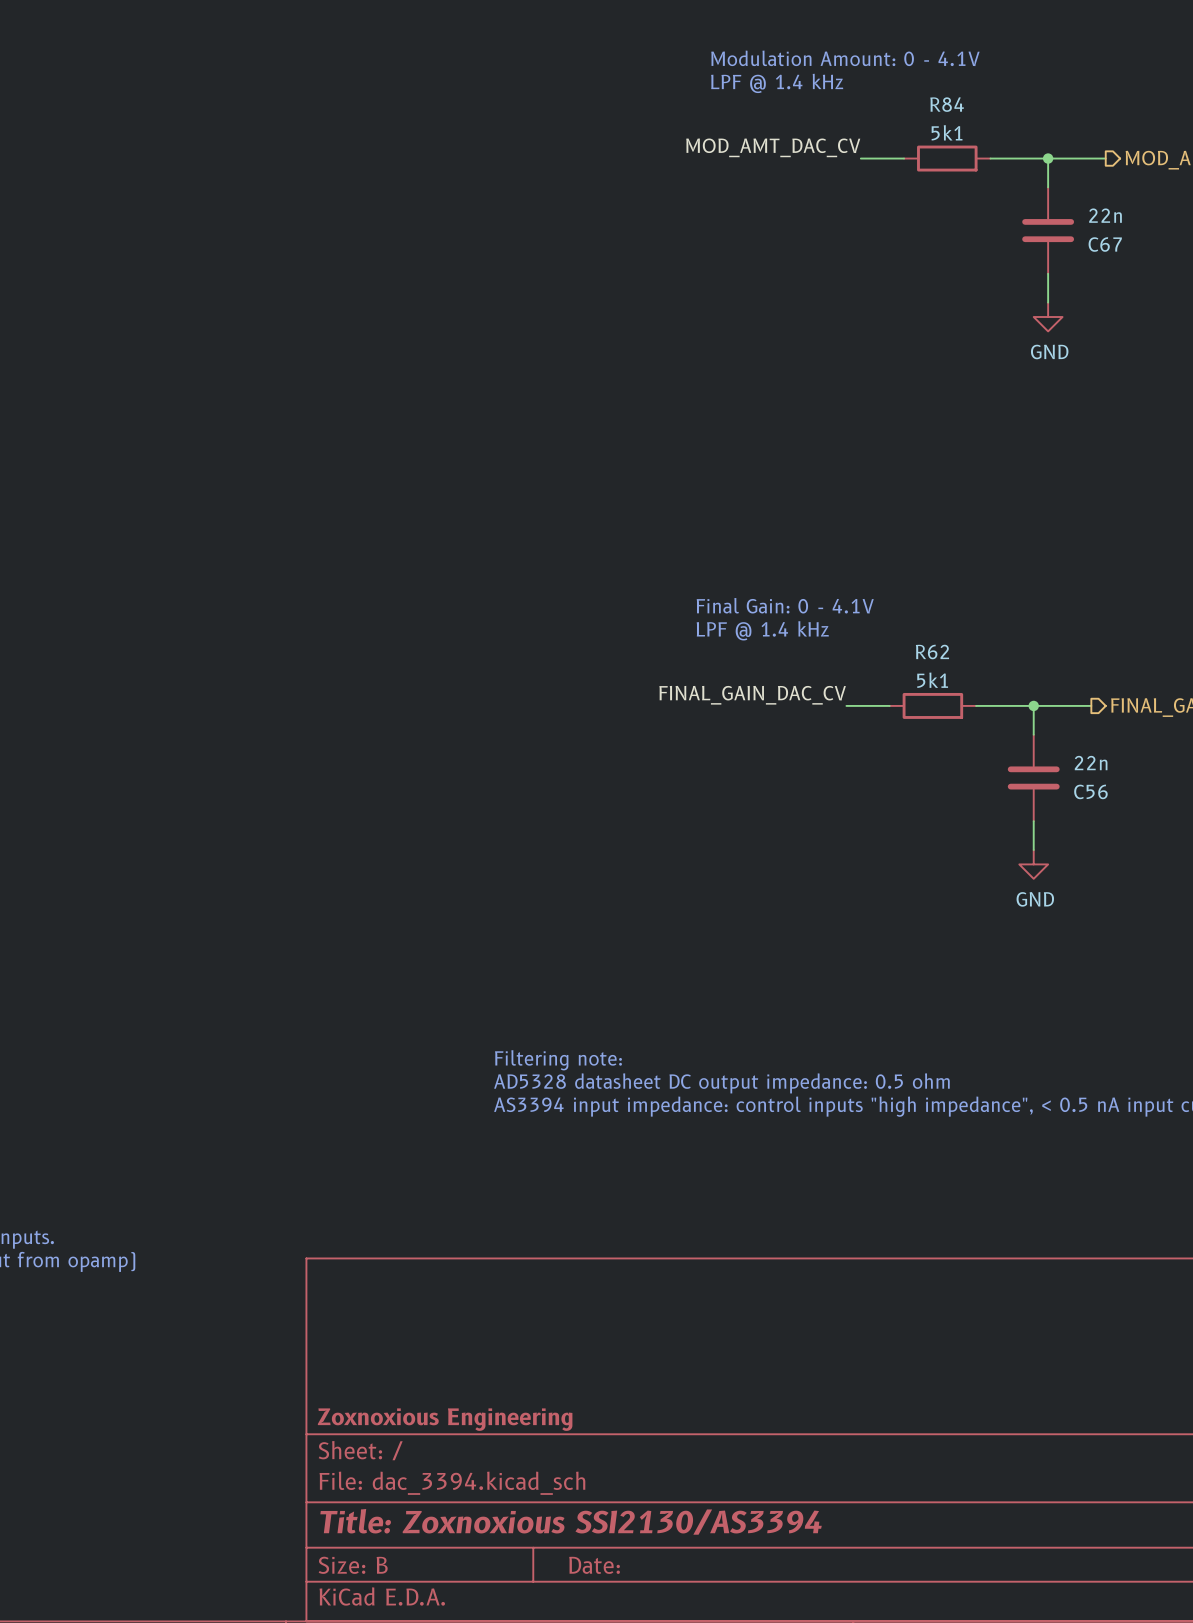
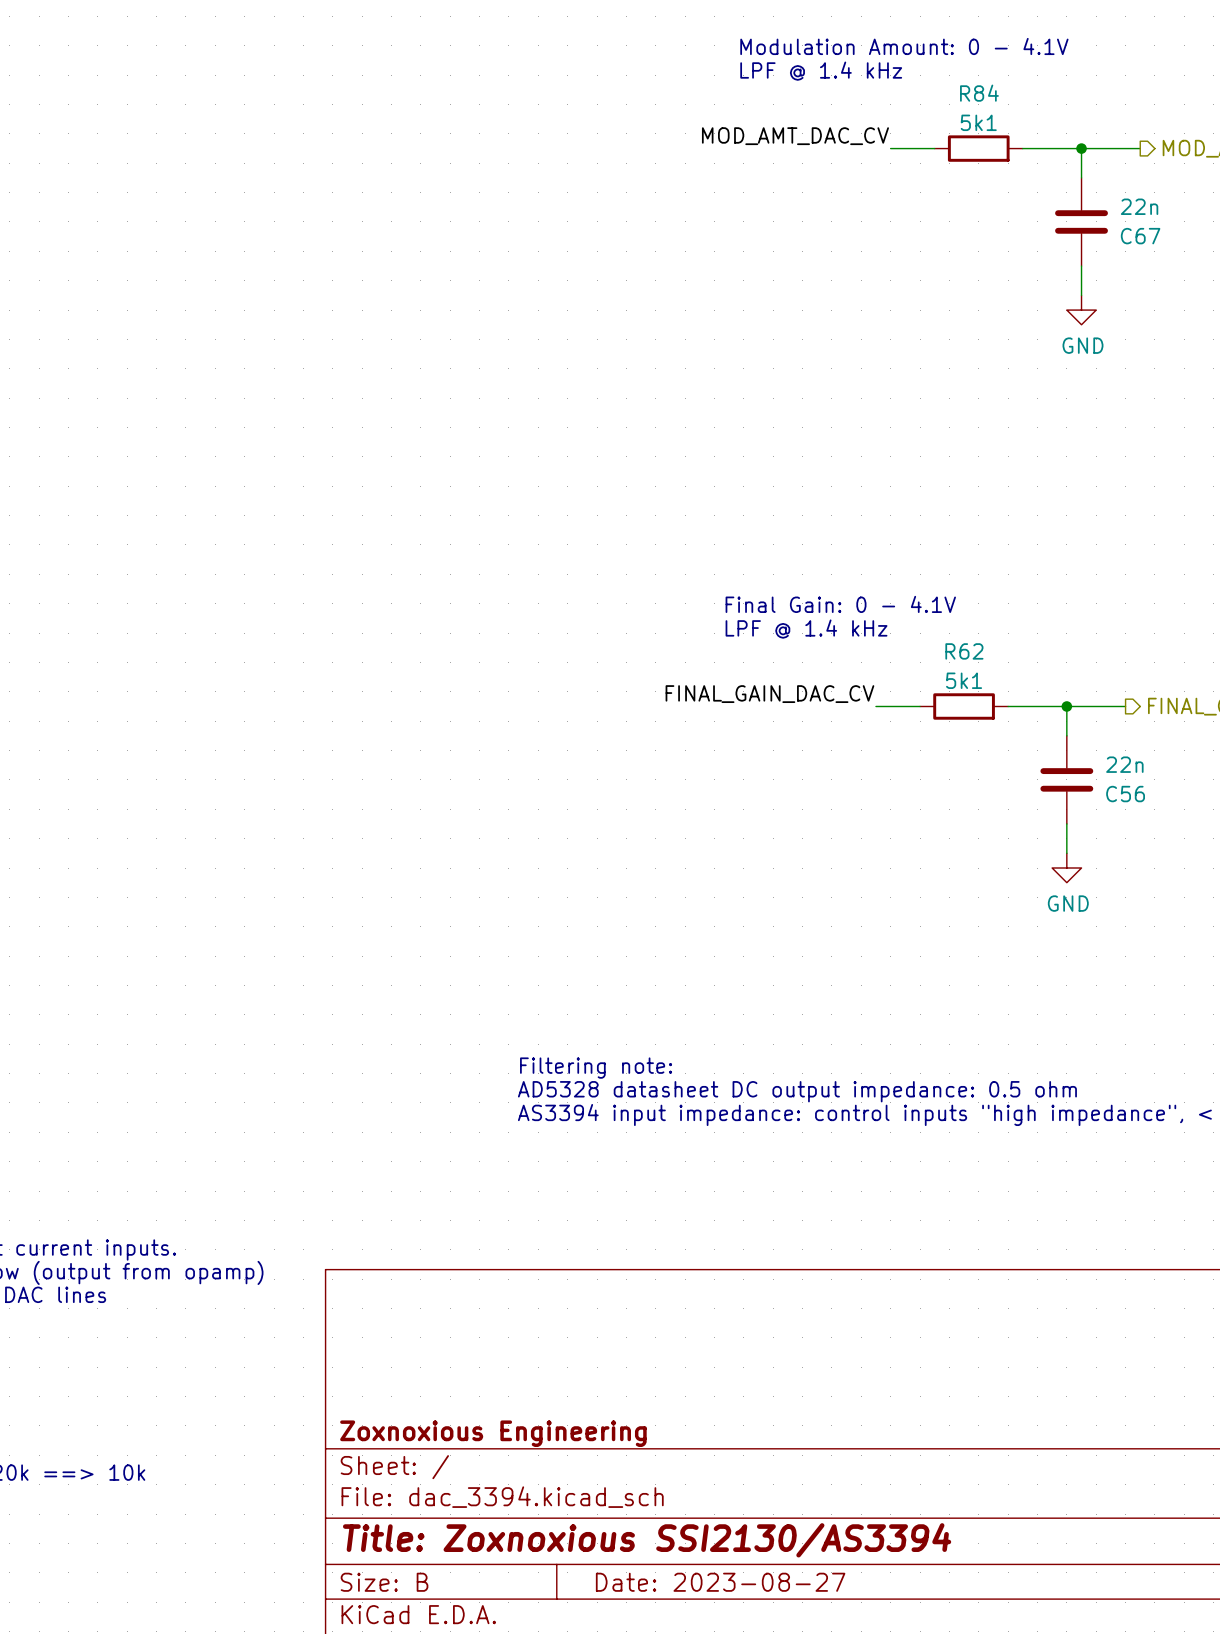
title block: Date: (594, 1565) -> Date: 2023-08-27 (720, 1582)

